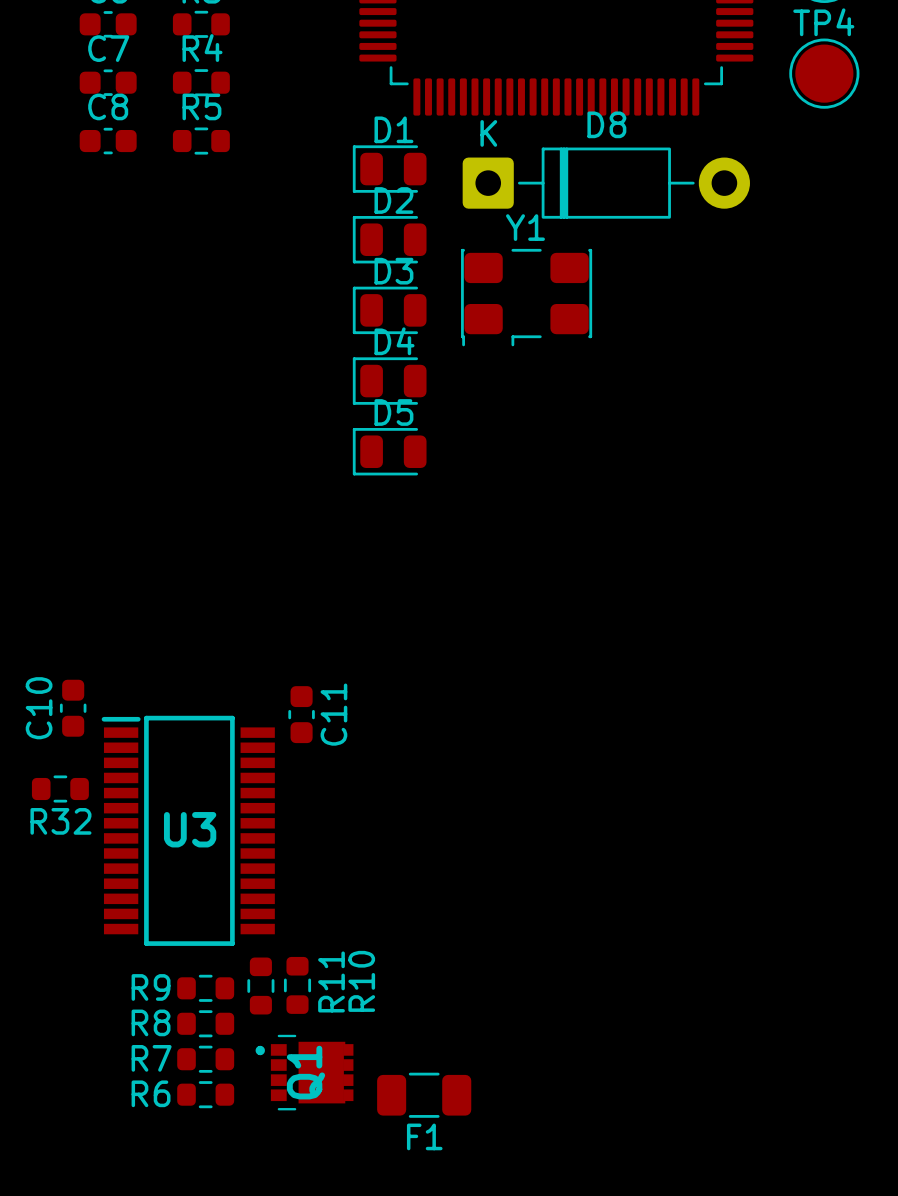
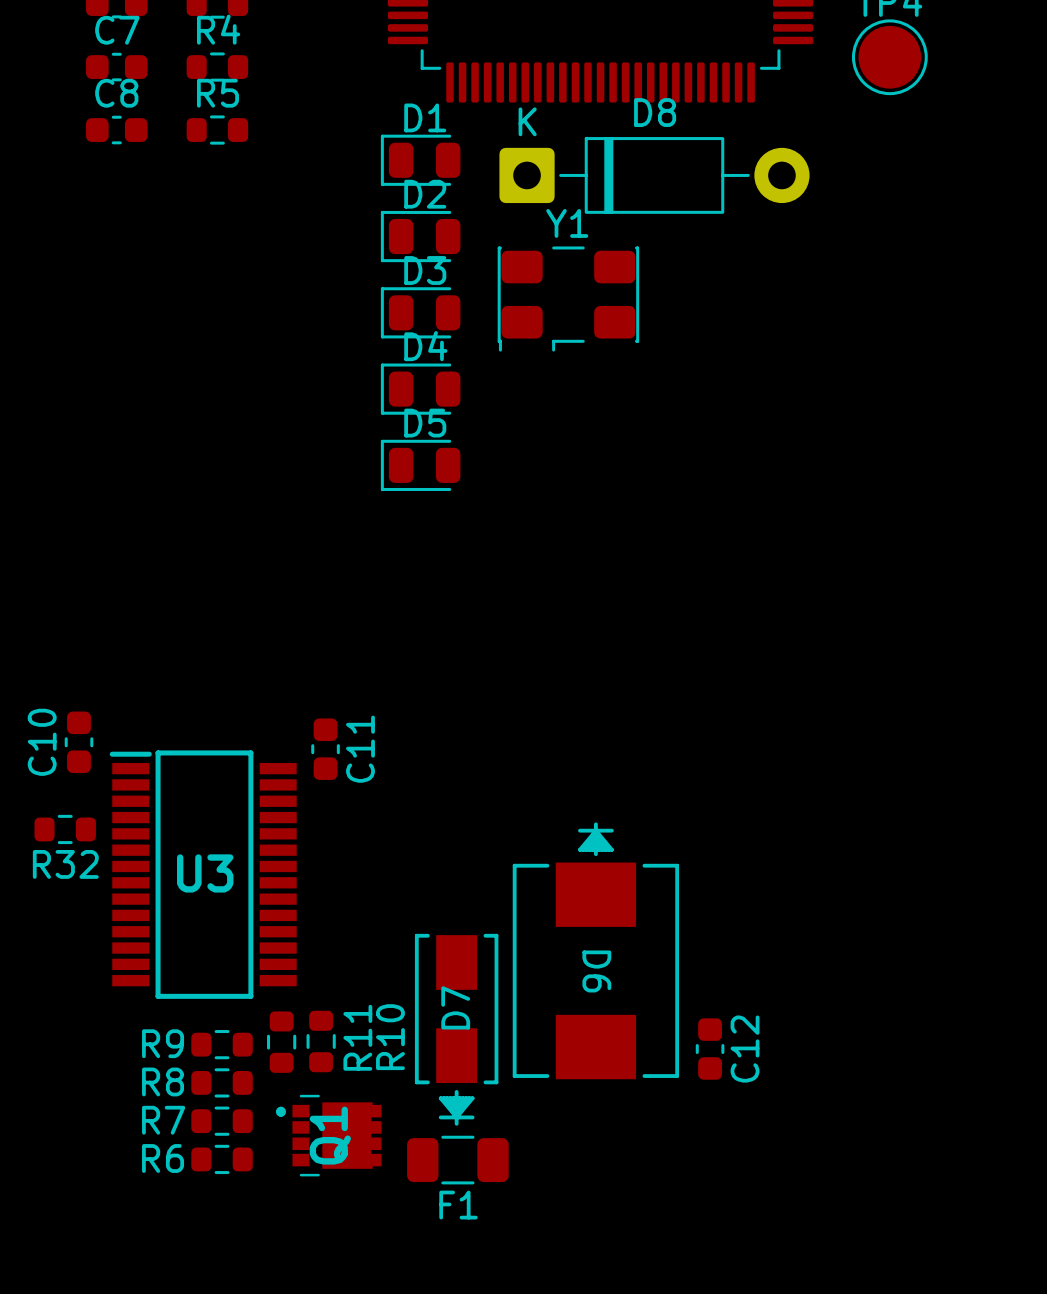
D6: none -> (595, 950)
D7: none -> (456, 1029)
C12: none -> (710, 1049)

